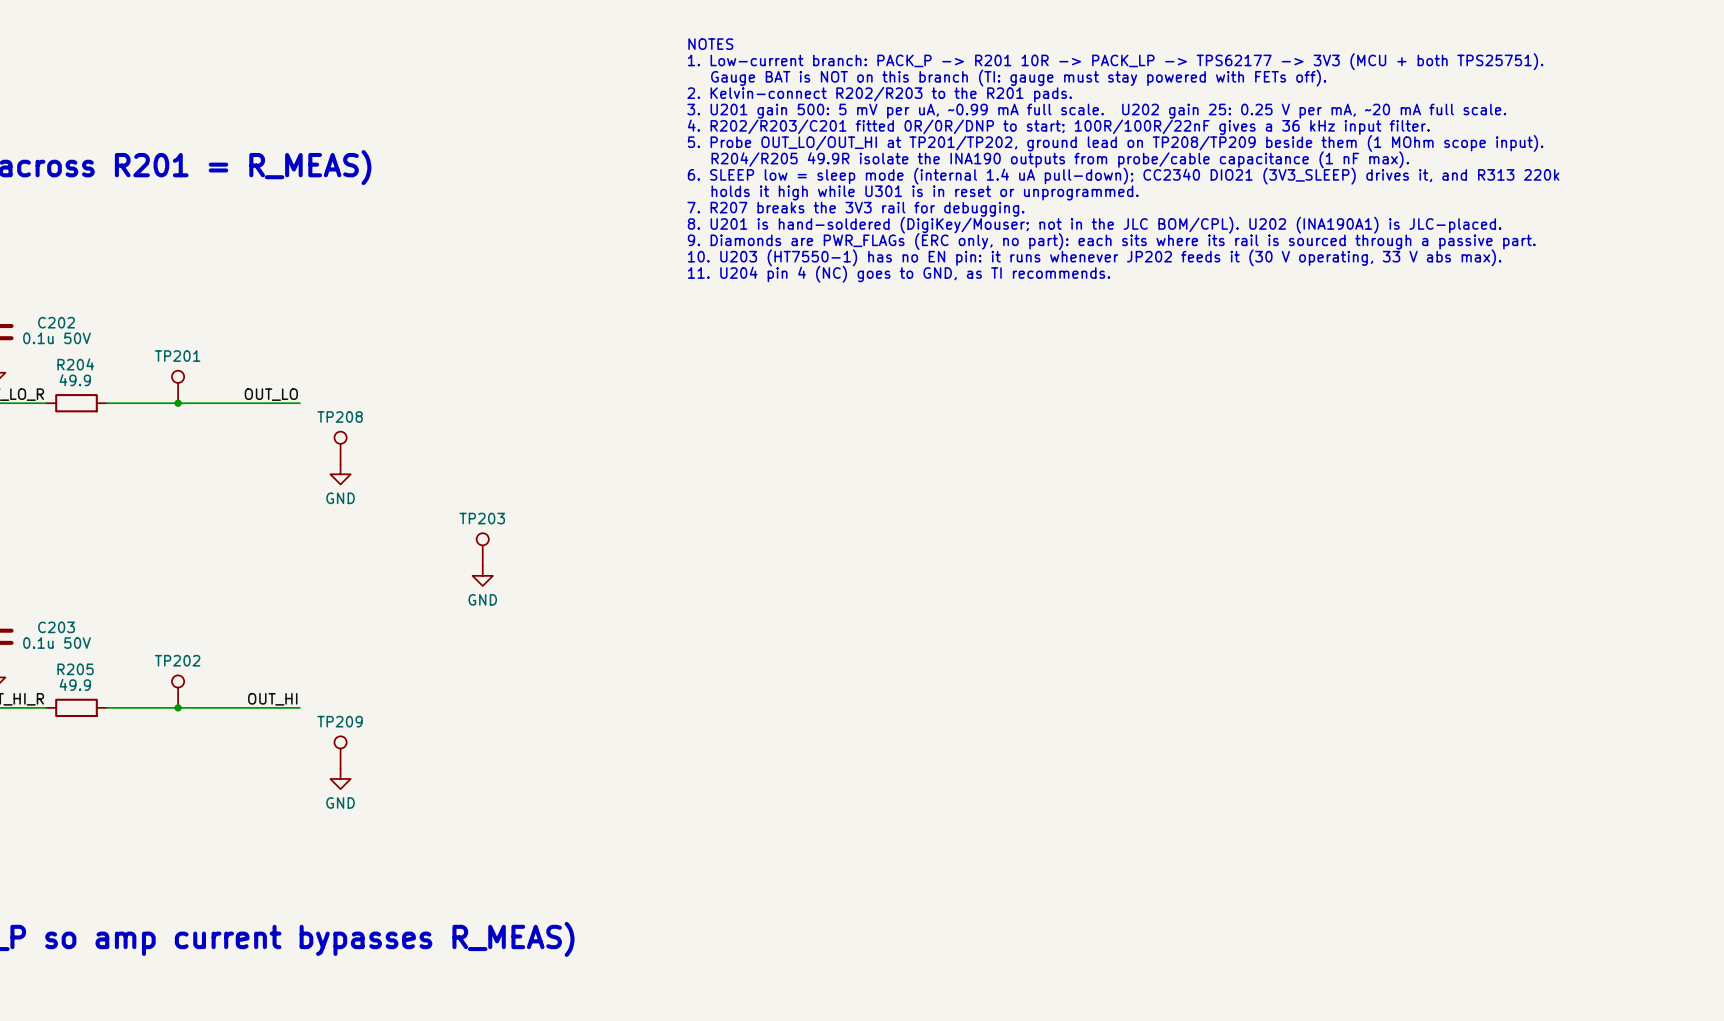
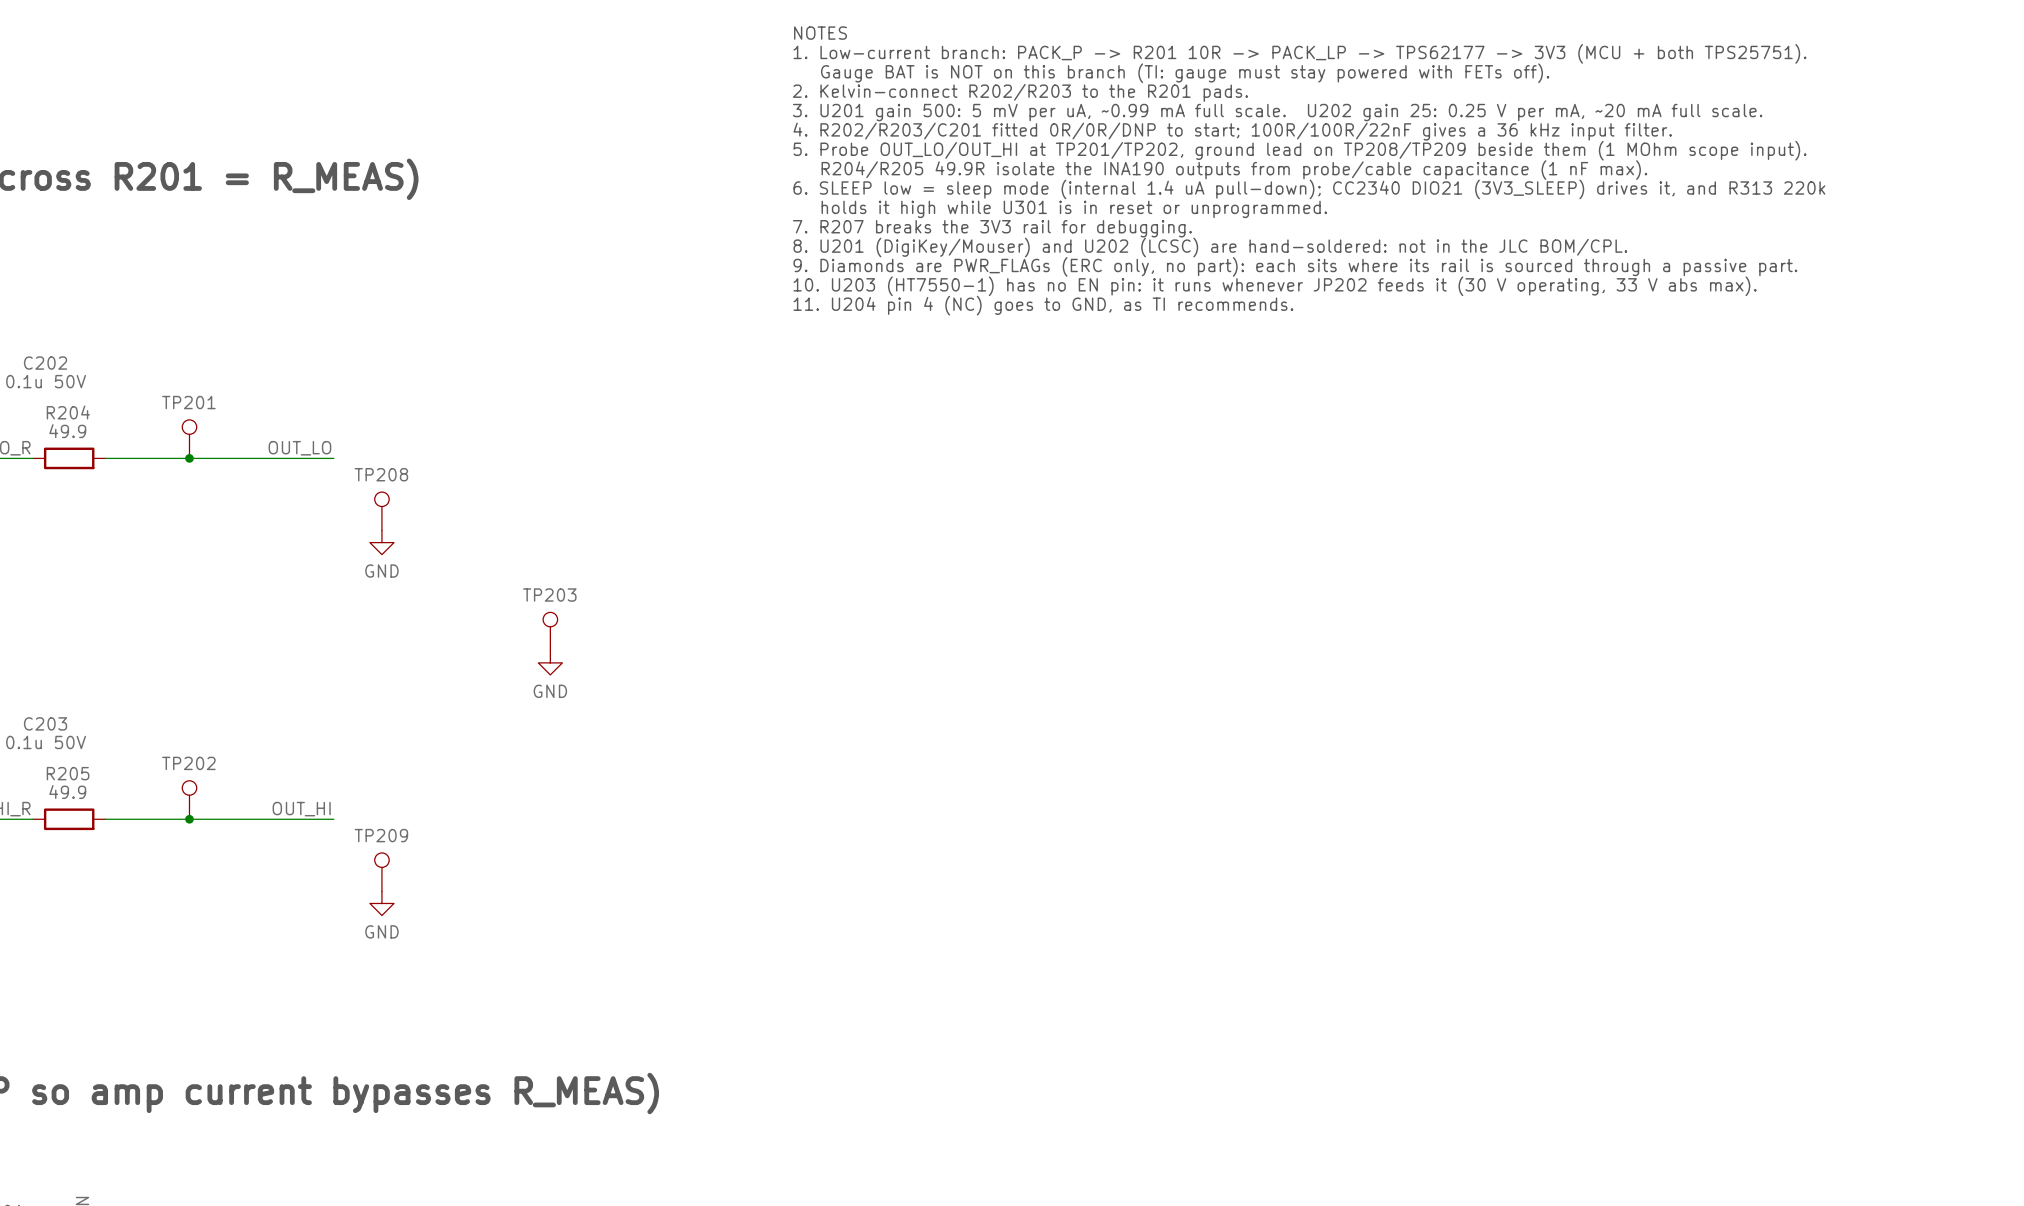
text: 8. U201 is hand-soldered (DigiKey/Mouser; not in the JLC BOM/CPL). U202 (INA190A1) is JLC-placed. (1094, 225) -> 8. U201 (DigiKey/Mouser) and U202 (LCSC) are hand-soldered: not in the JLC BOM/CPL. (1210, 247)

